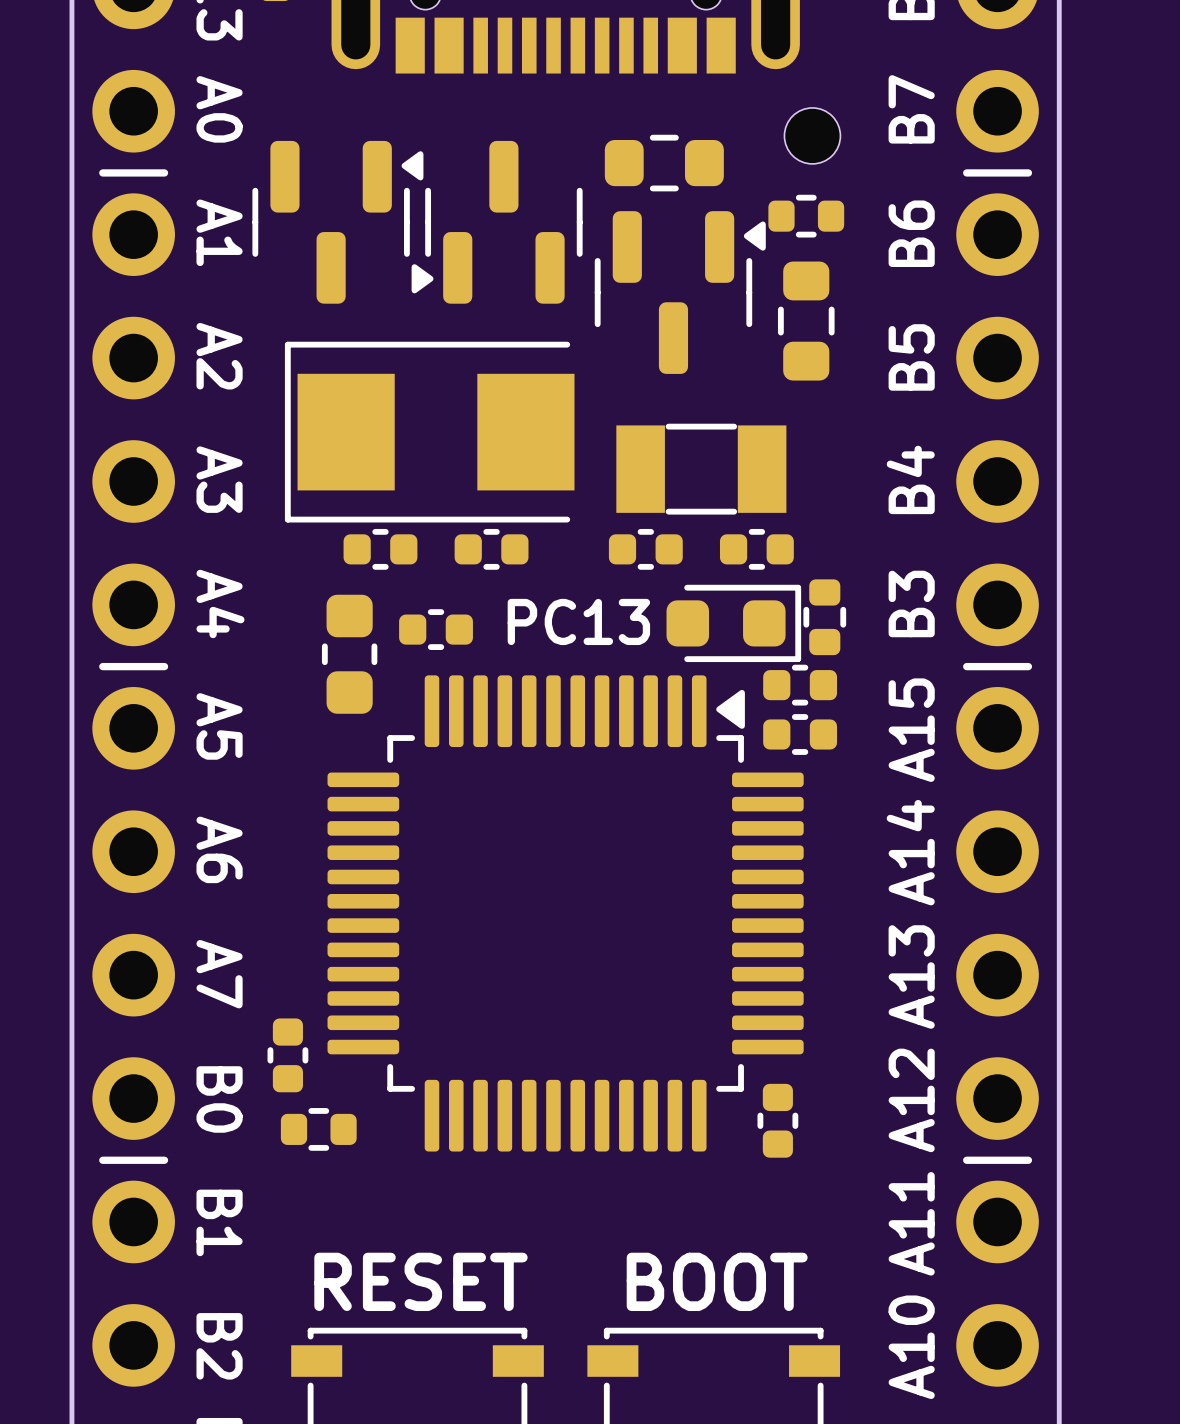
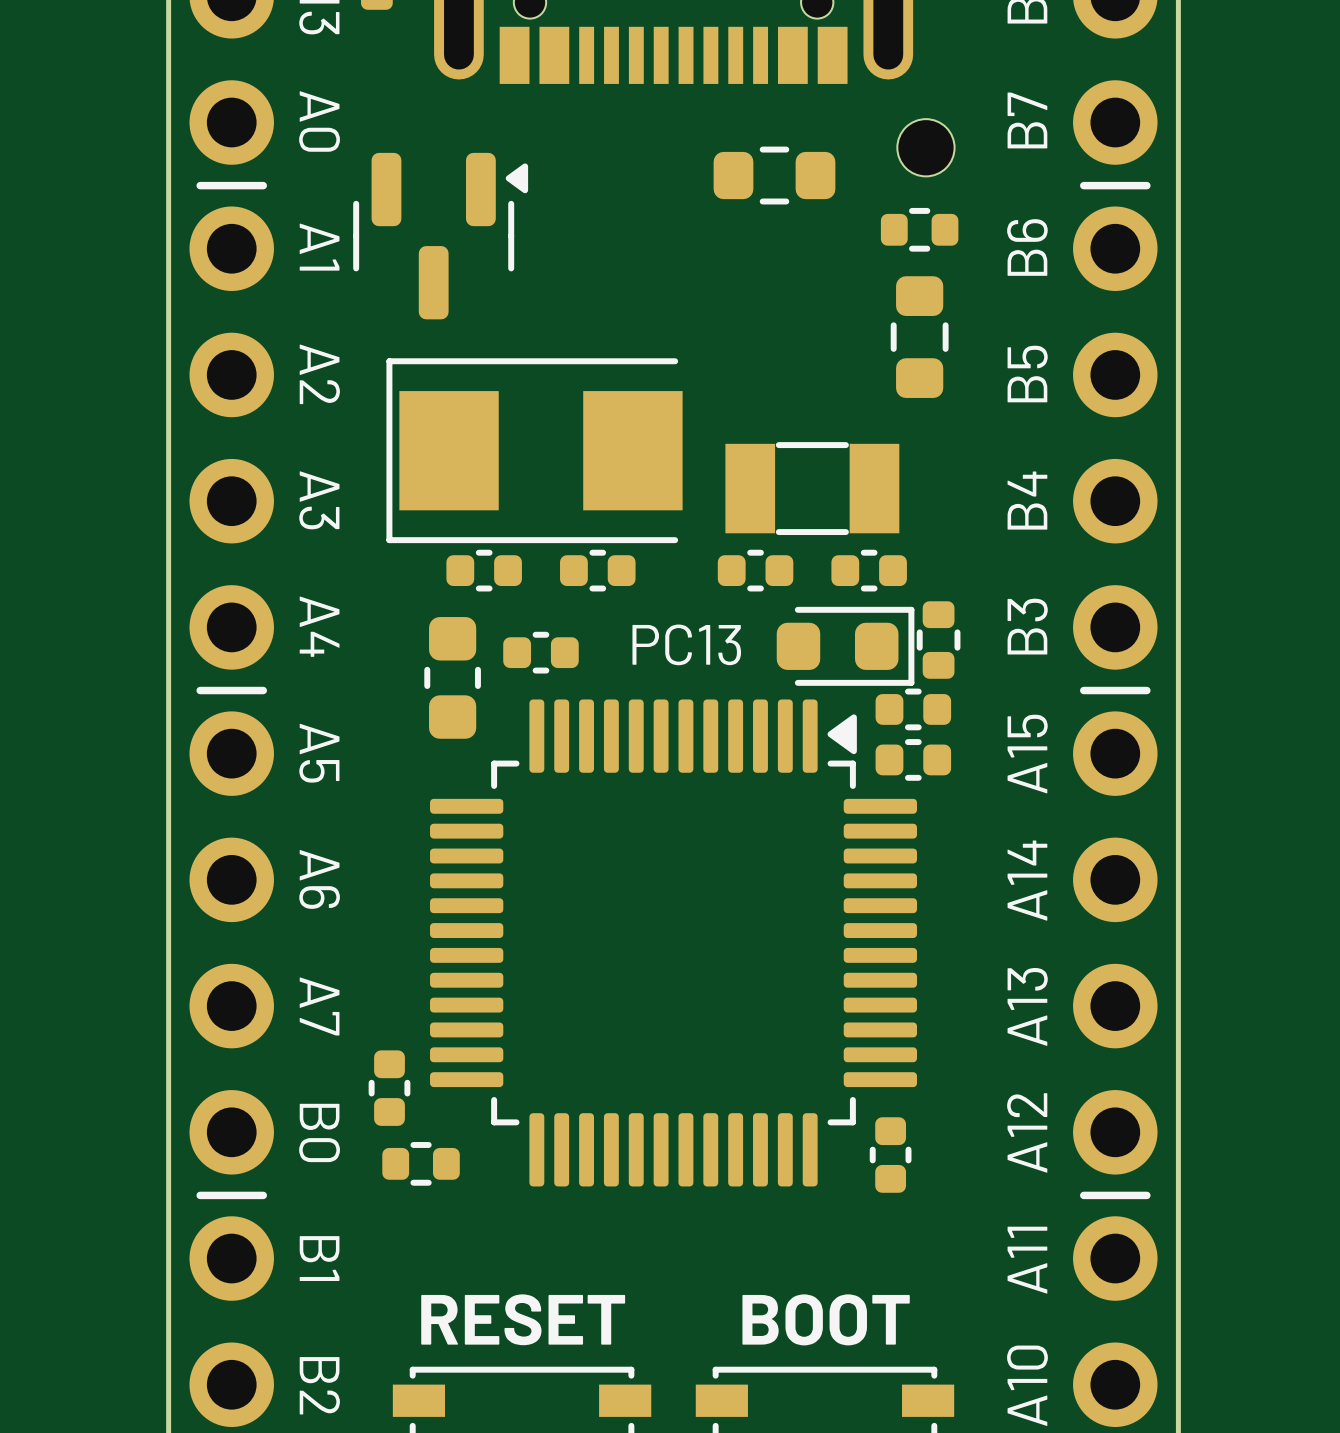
part: (497, 222) -> none
part: (680, 292) -> none

